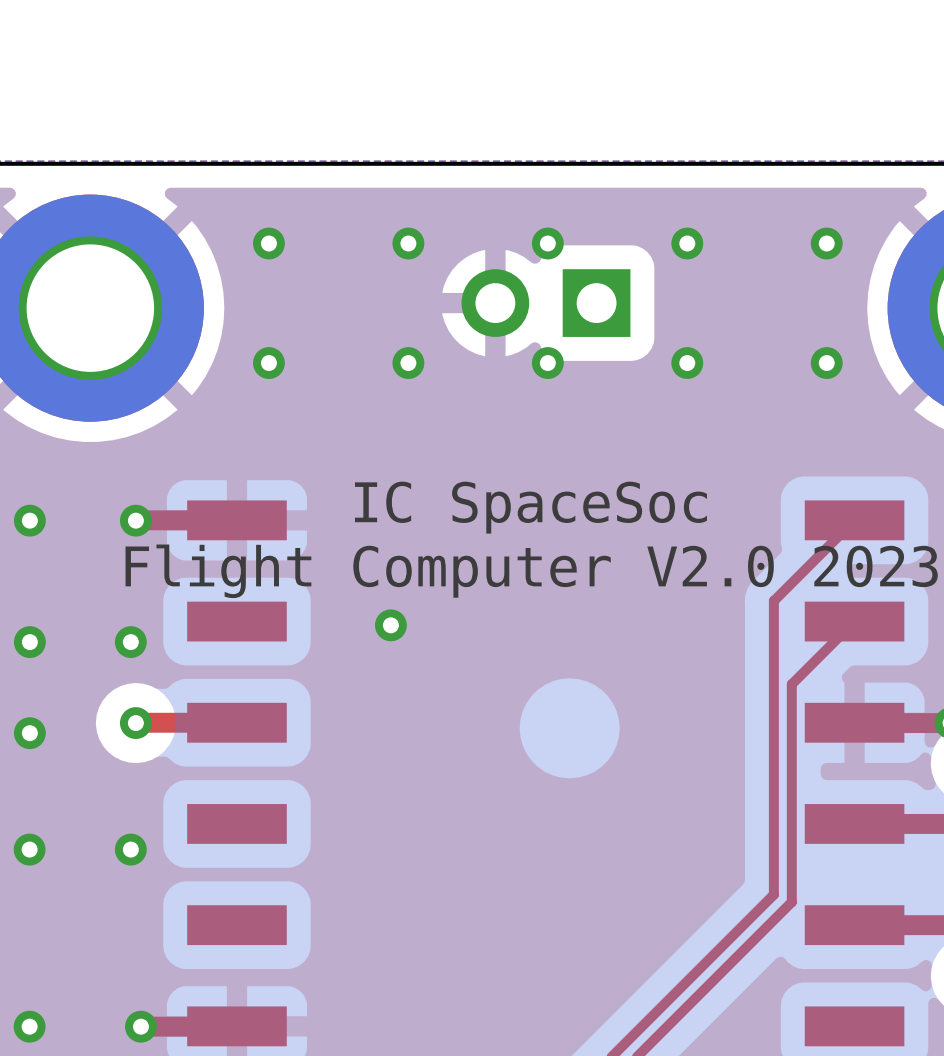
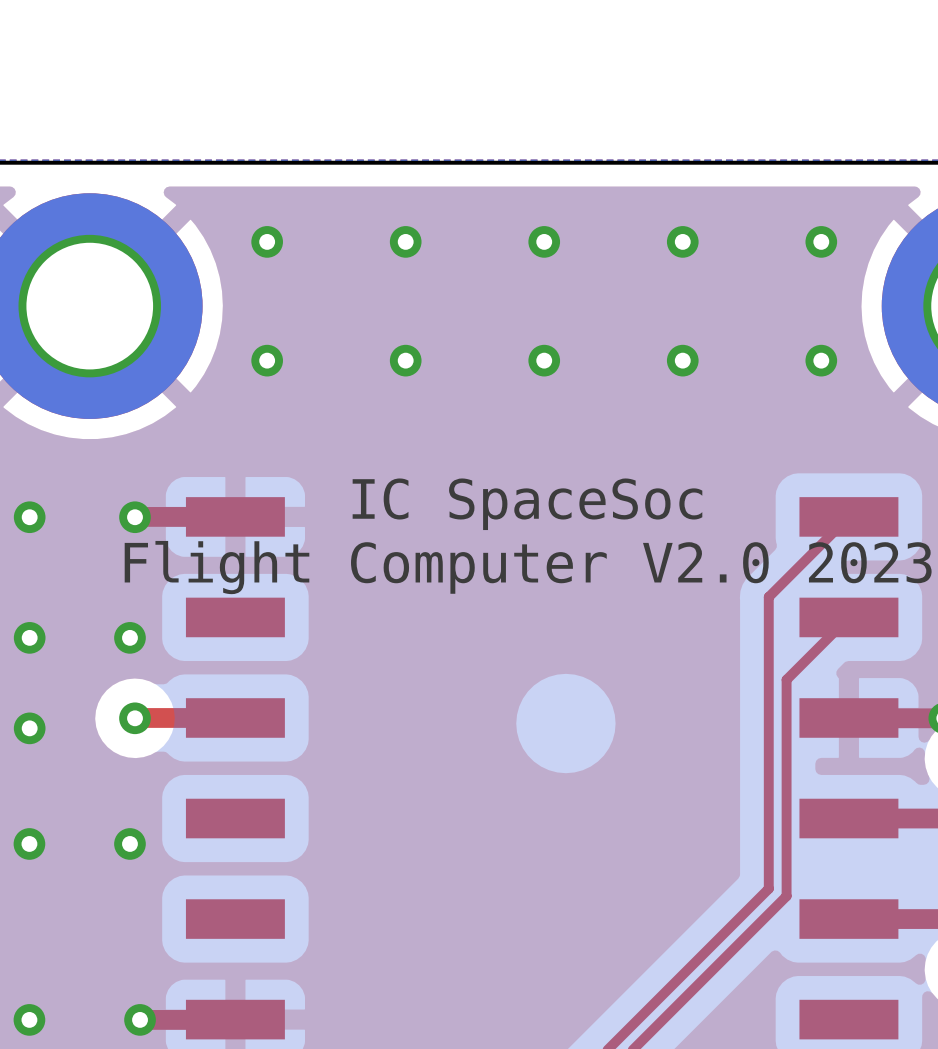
part: (545, 303) -> none
via: (390, 625) -> none

